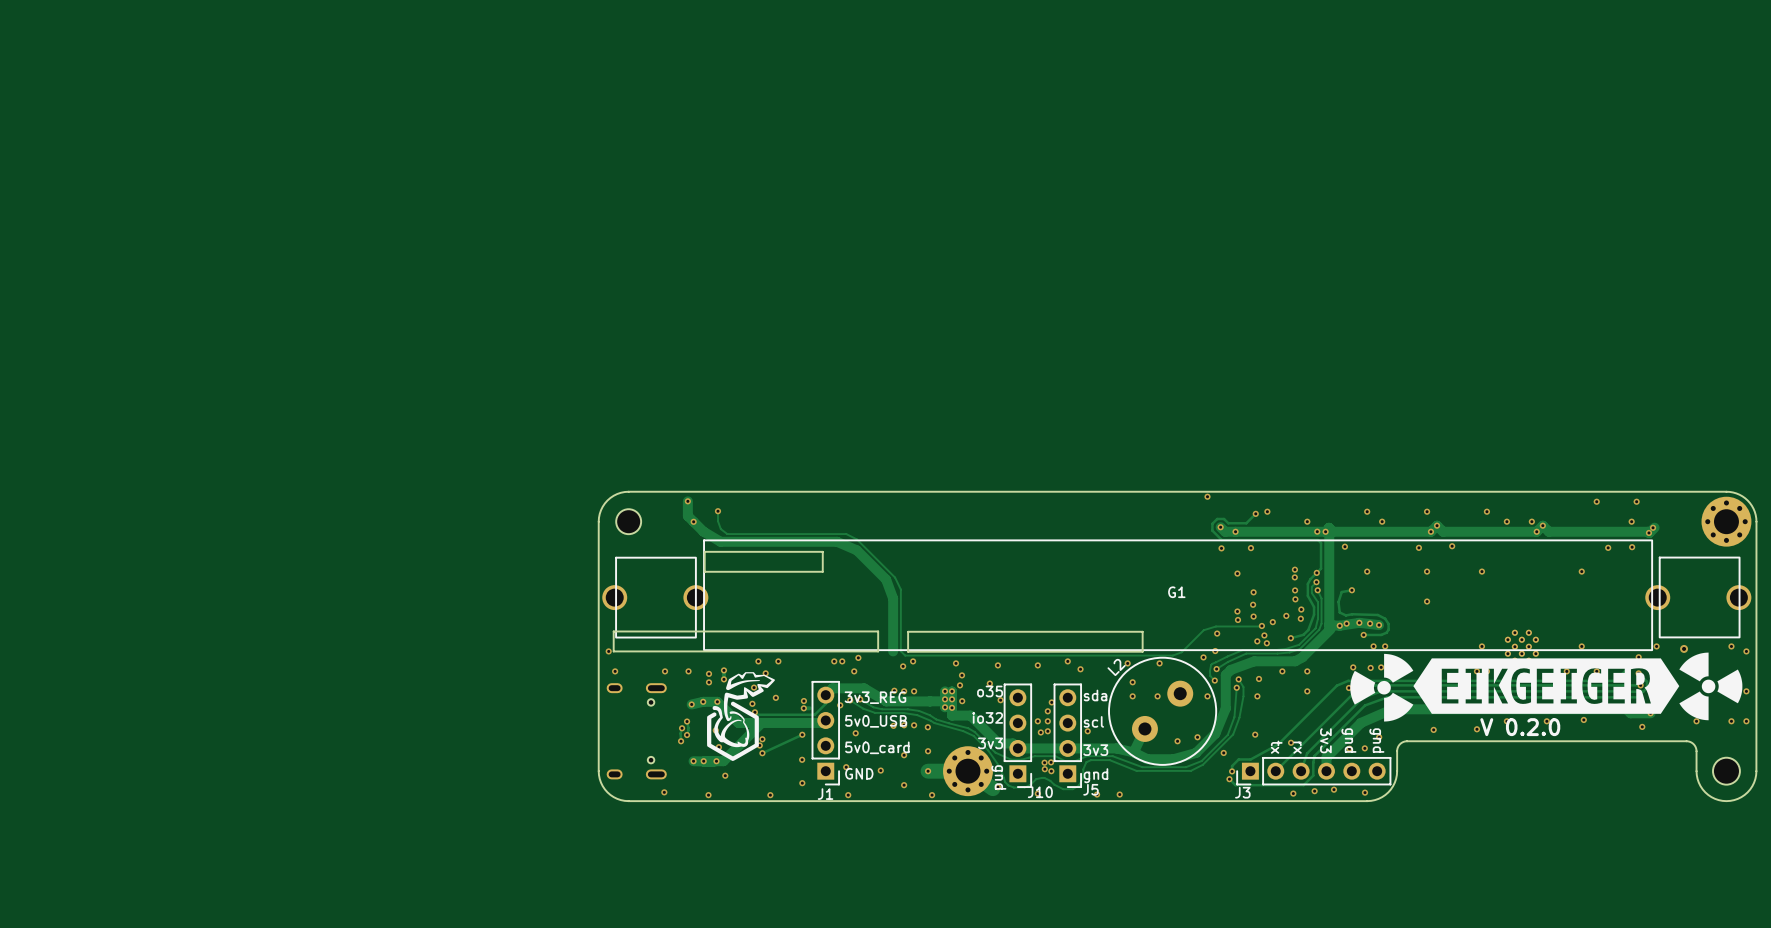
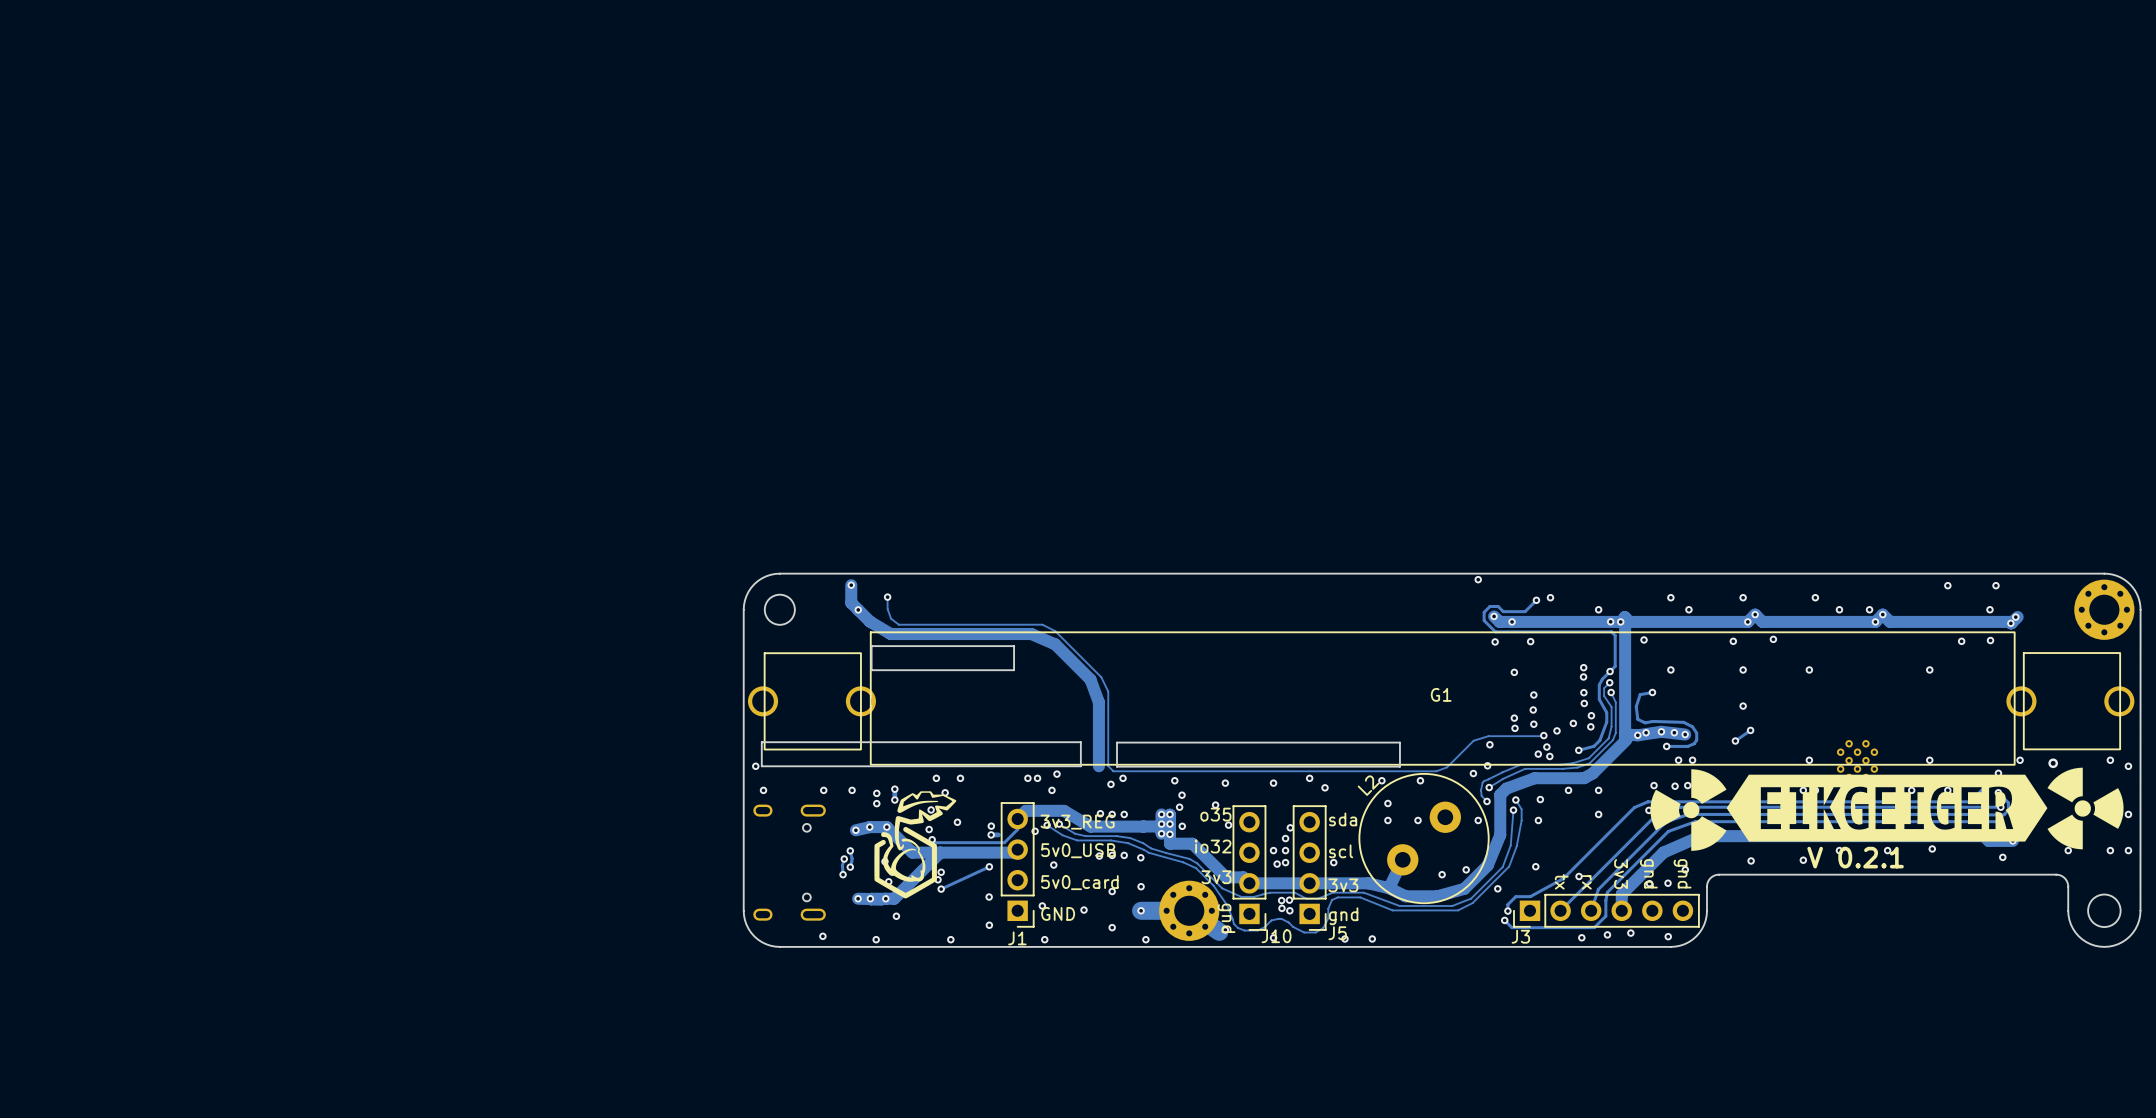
track: none -> (1750, 730) (1735, 741)
via: none -> (1750, 730)
via: none -> (1735, 741)
text: V 0.2.0 (1520, 727) -> V 0.2.1 (1855, 857)

